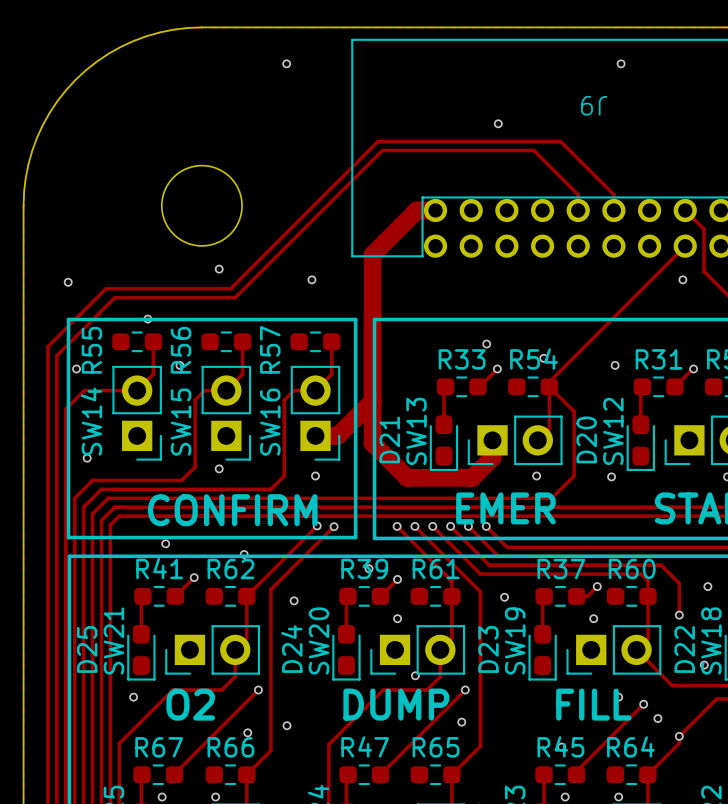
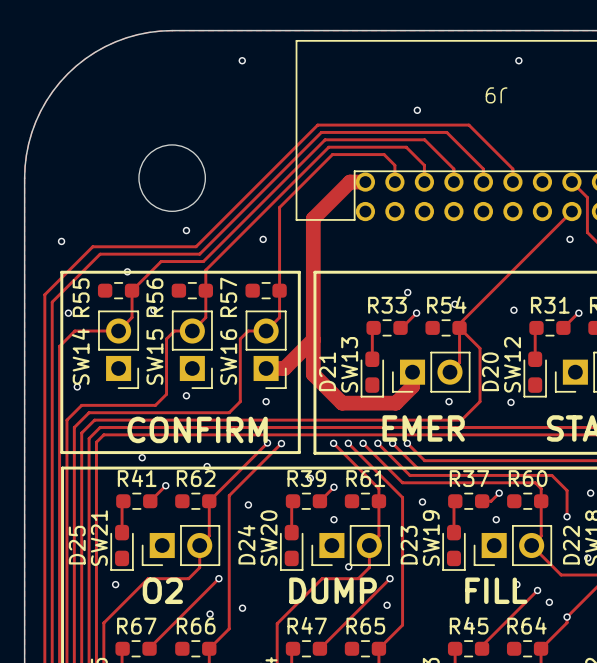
track: none -> (394, 182) (394, 165) (384, 154) (332, 154) (279, 207) (279, 290)
track: none -> (424, 182) (424, 165) (406, 147) (328, 147) (205, 270) (205, 290)
track: none -> (453, 182) (453, 169) (424, 139) (325, 139) (203, 261) (161, 261) (132, 290)

